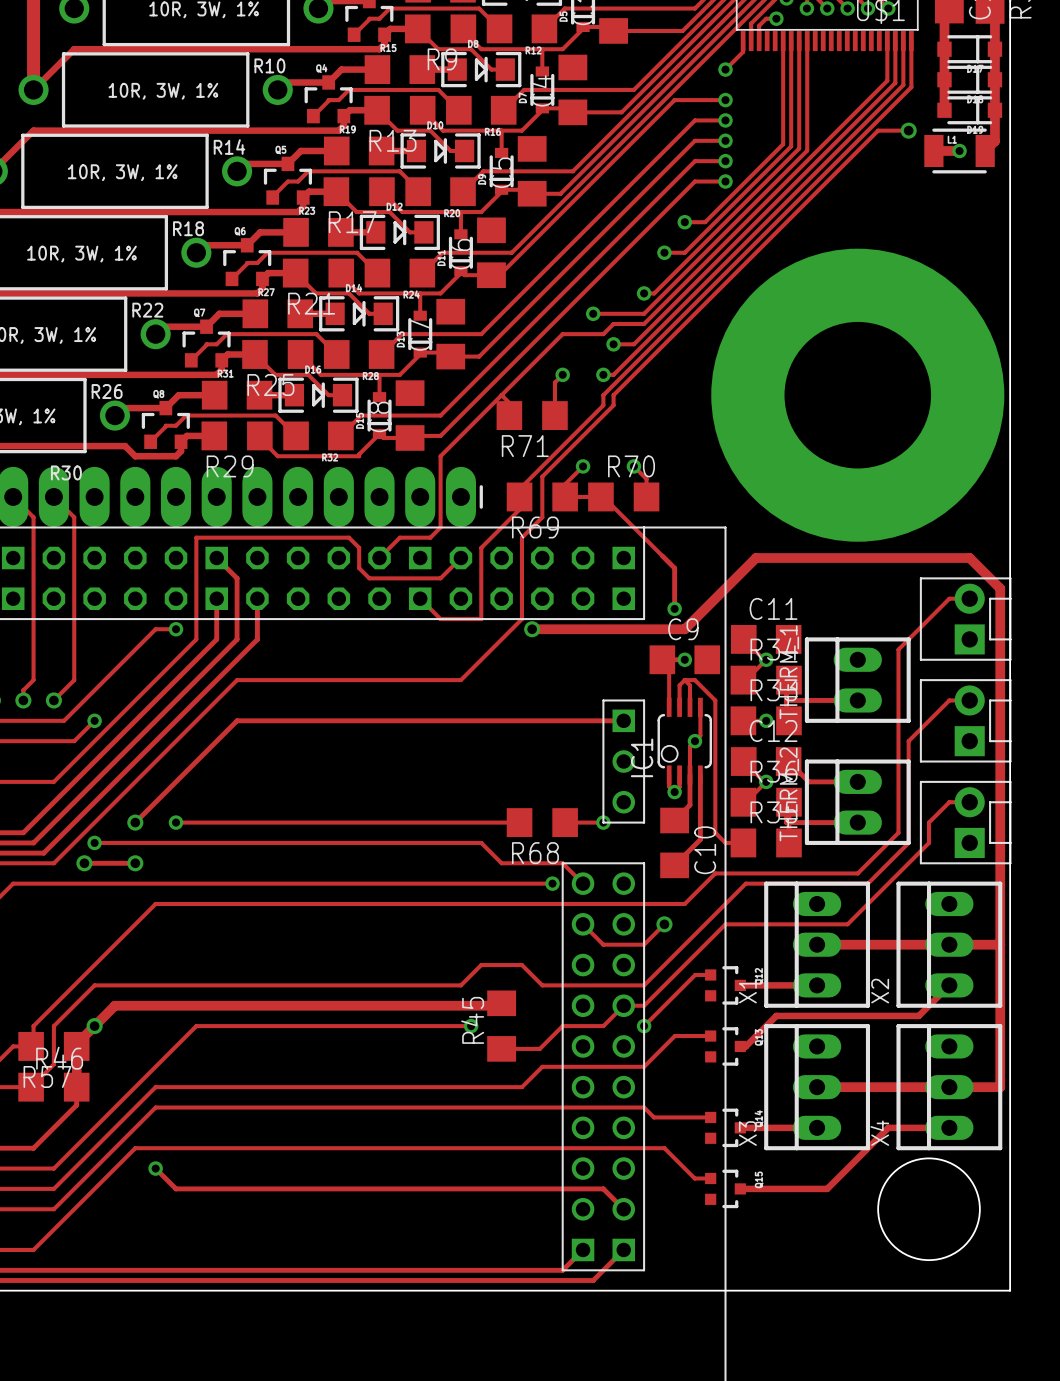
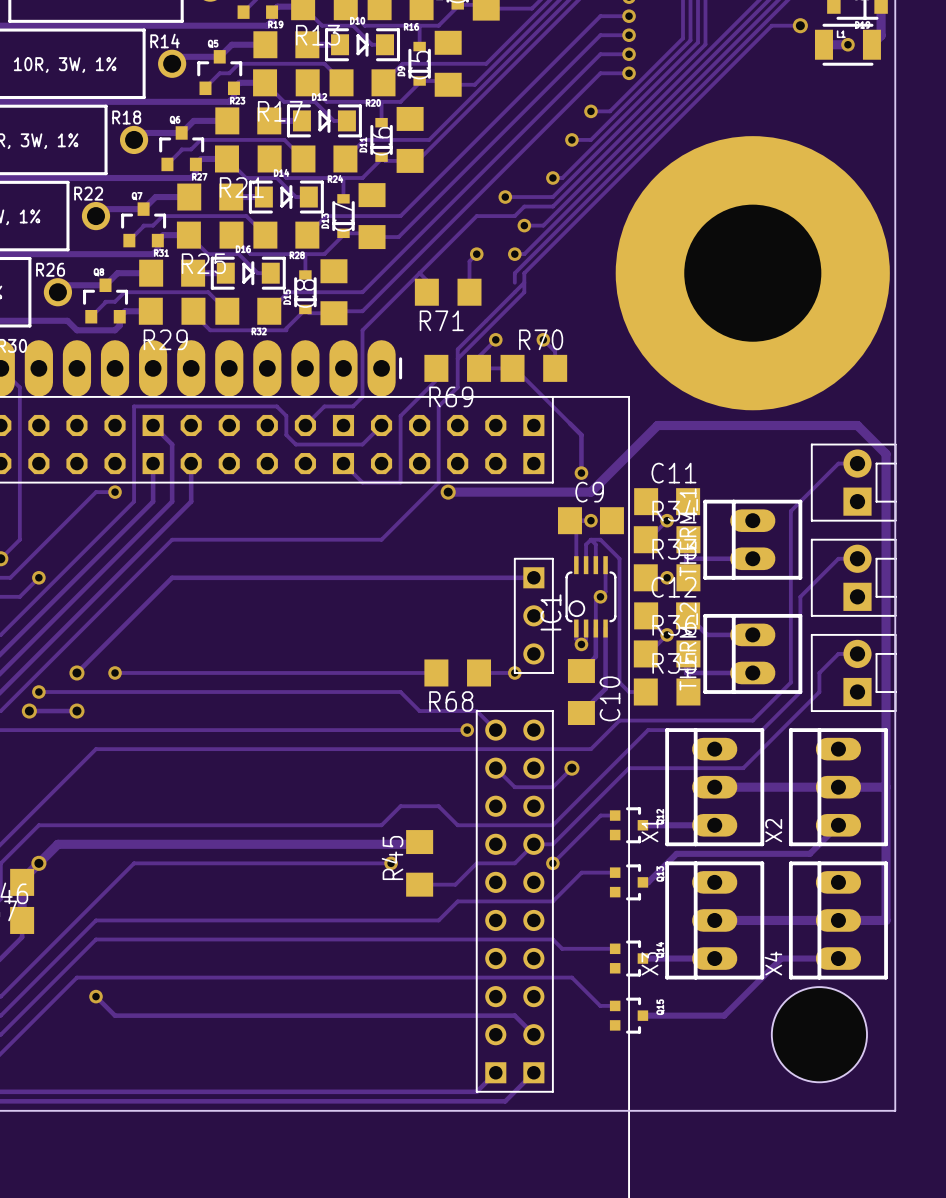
track: (603, 405) (519, 489) (519, 496) -> none
track: none -> (524, 282) (524, 292) (457, 358)

